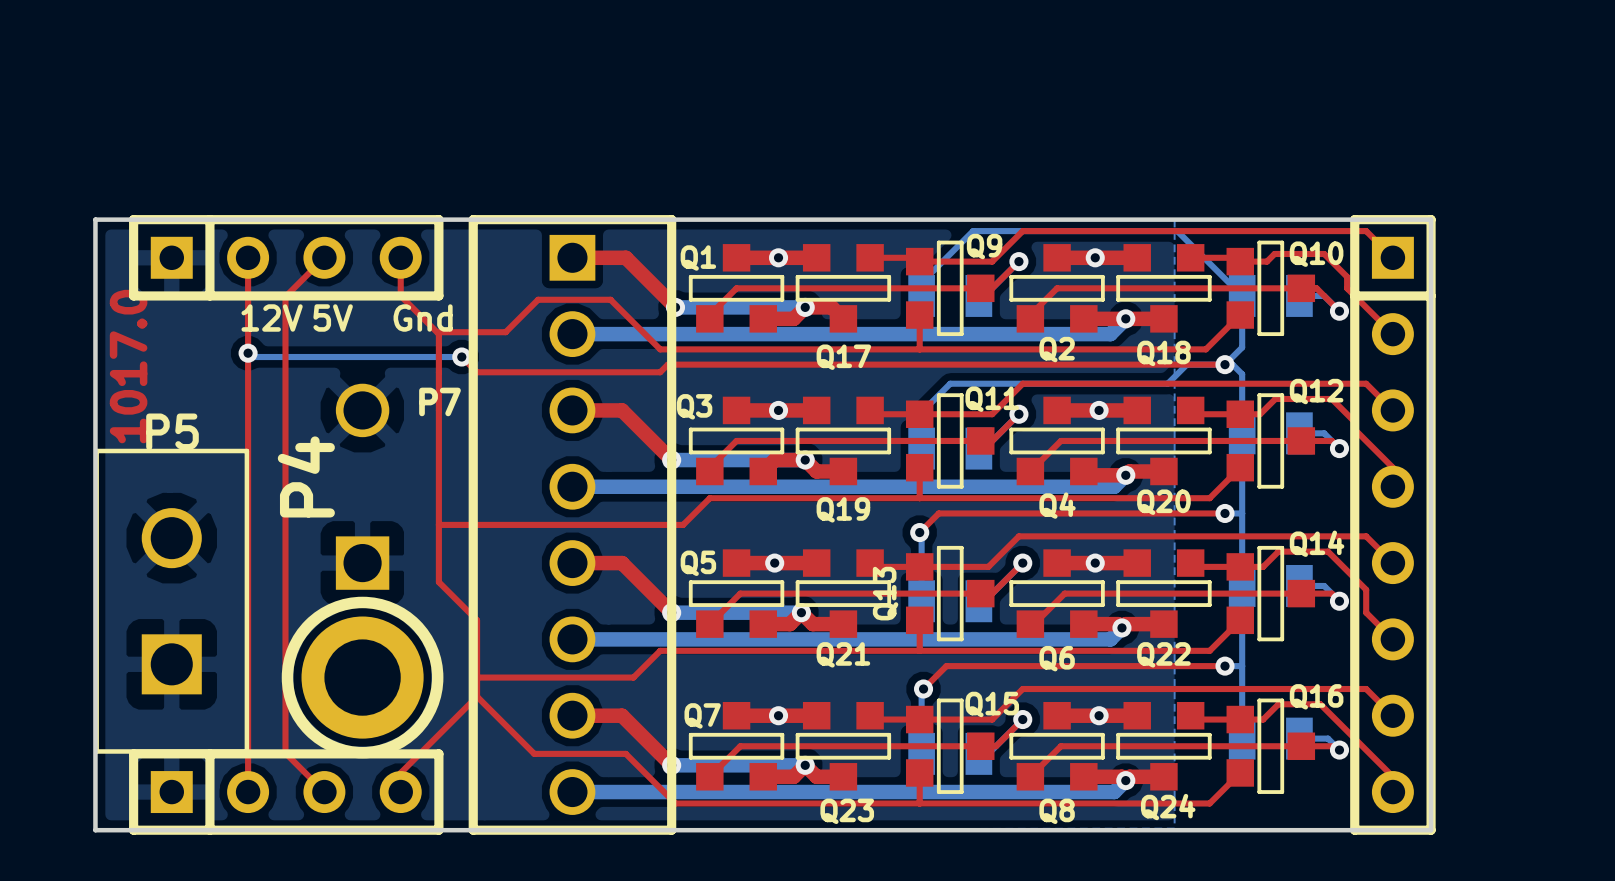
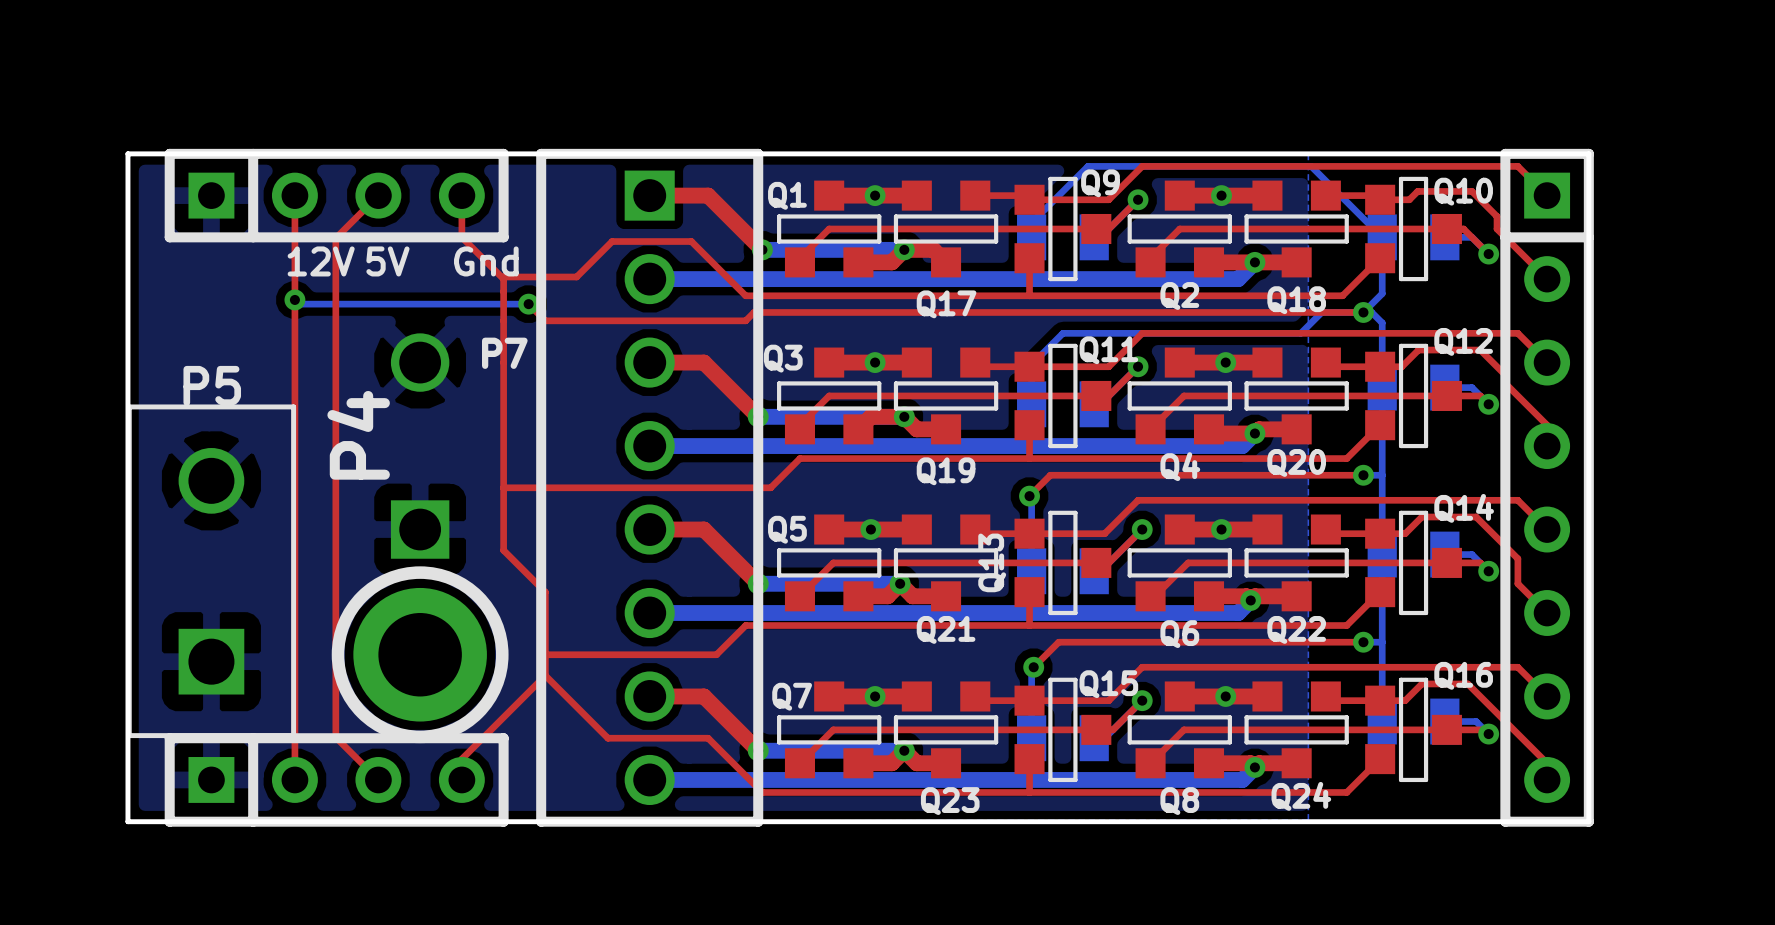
text: 1017.0 (128, 366) -> none
P5 footprint: [94, 448, 250, 754] -> [126, 404, 297, 739]

